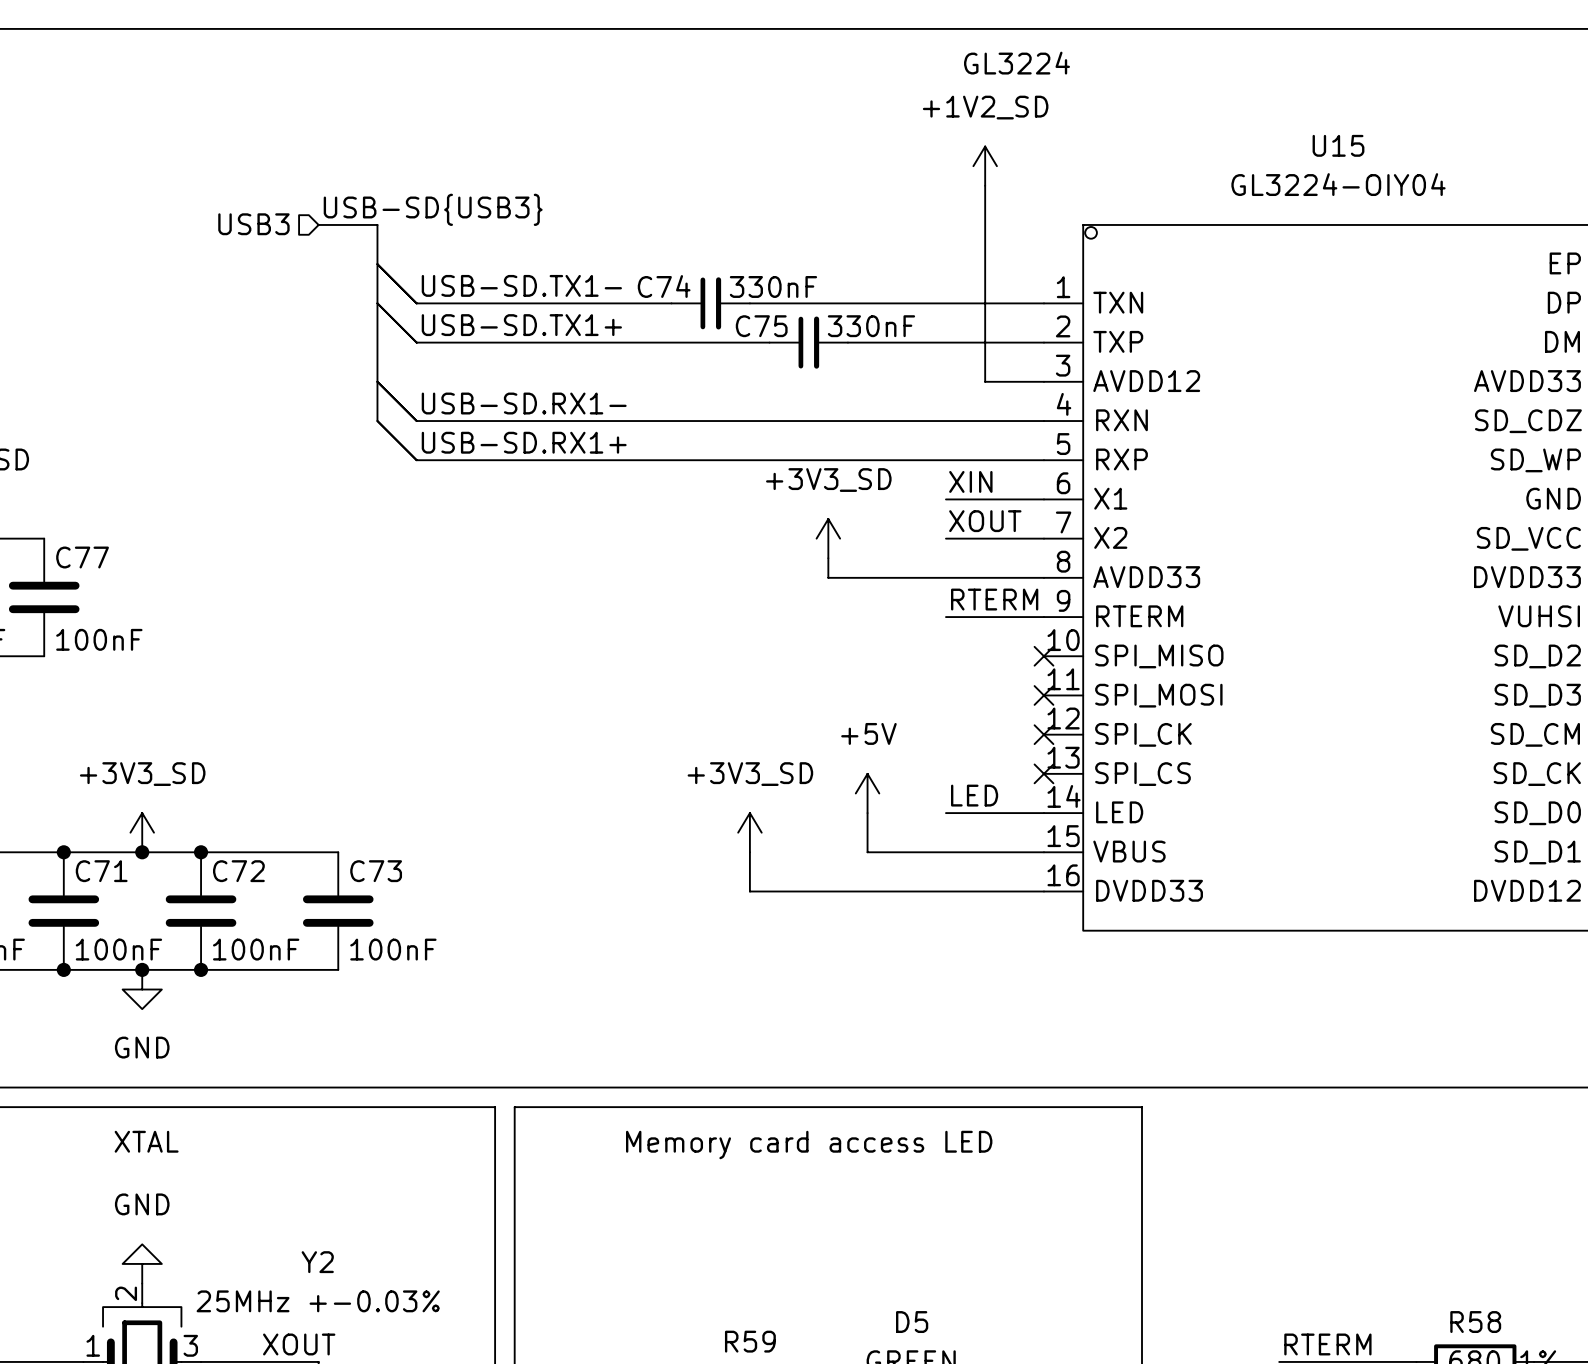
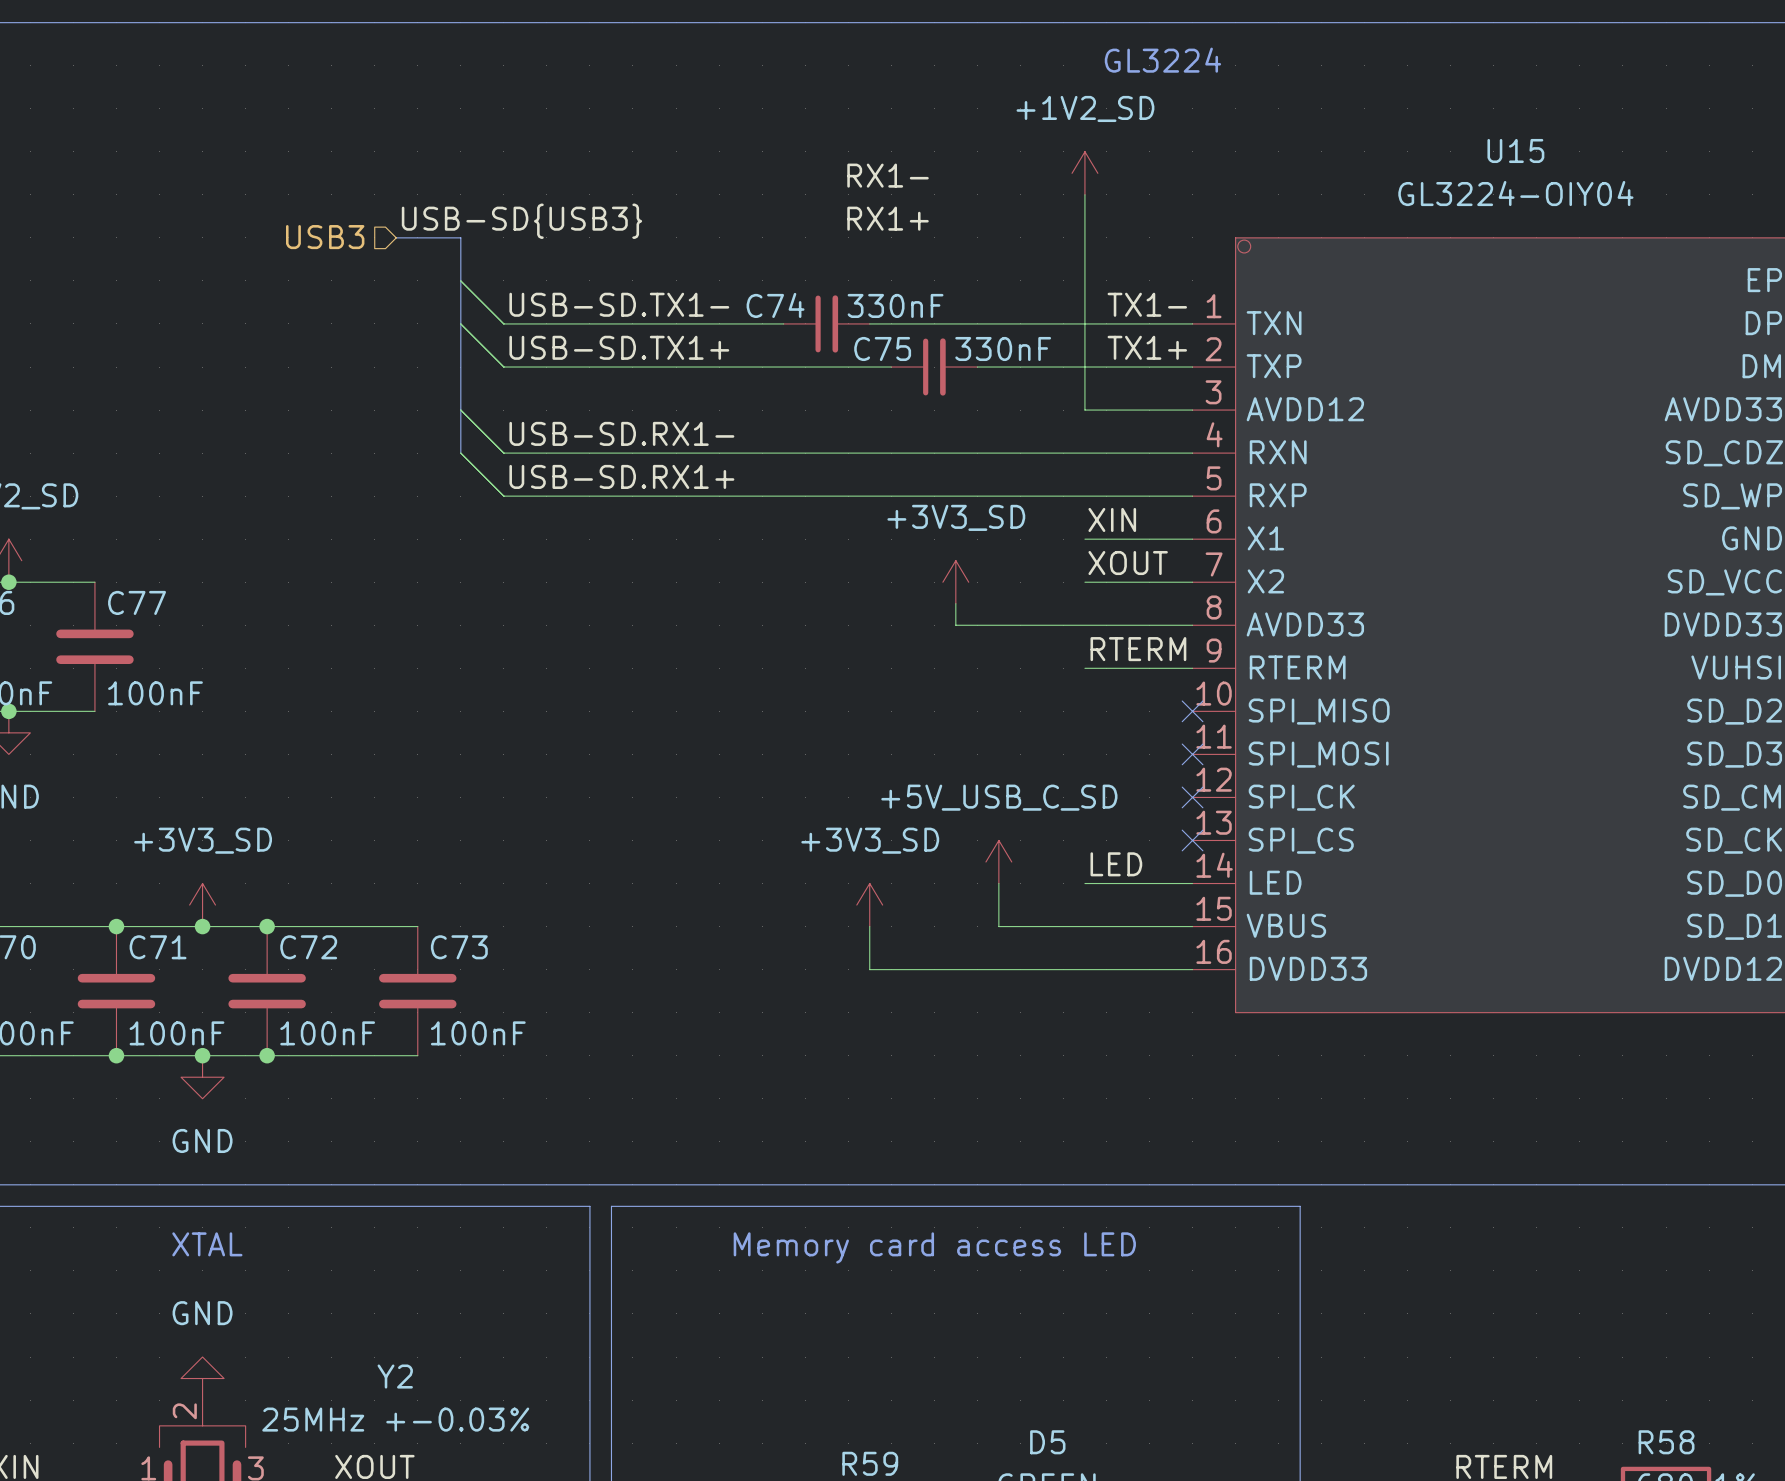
power symbol position: +1V2_SD (985, 166) -> +1V2_SD (1084, 173)
label: none -> RX1- (888, 175)
wire: (985, 185) (985, 381) -> (1084, 194) (1084, 410) (1127, 410)
label: none -> RX1+ (888, 218)
label: none -> TX1- (1147, 304)
label: none -> TX1+ (1147, 347)
power symbol: +5V (867, 793) -> +5V_USB_C_SD (998, 862)

